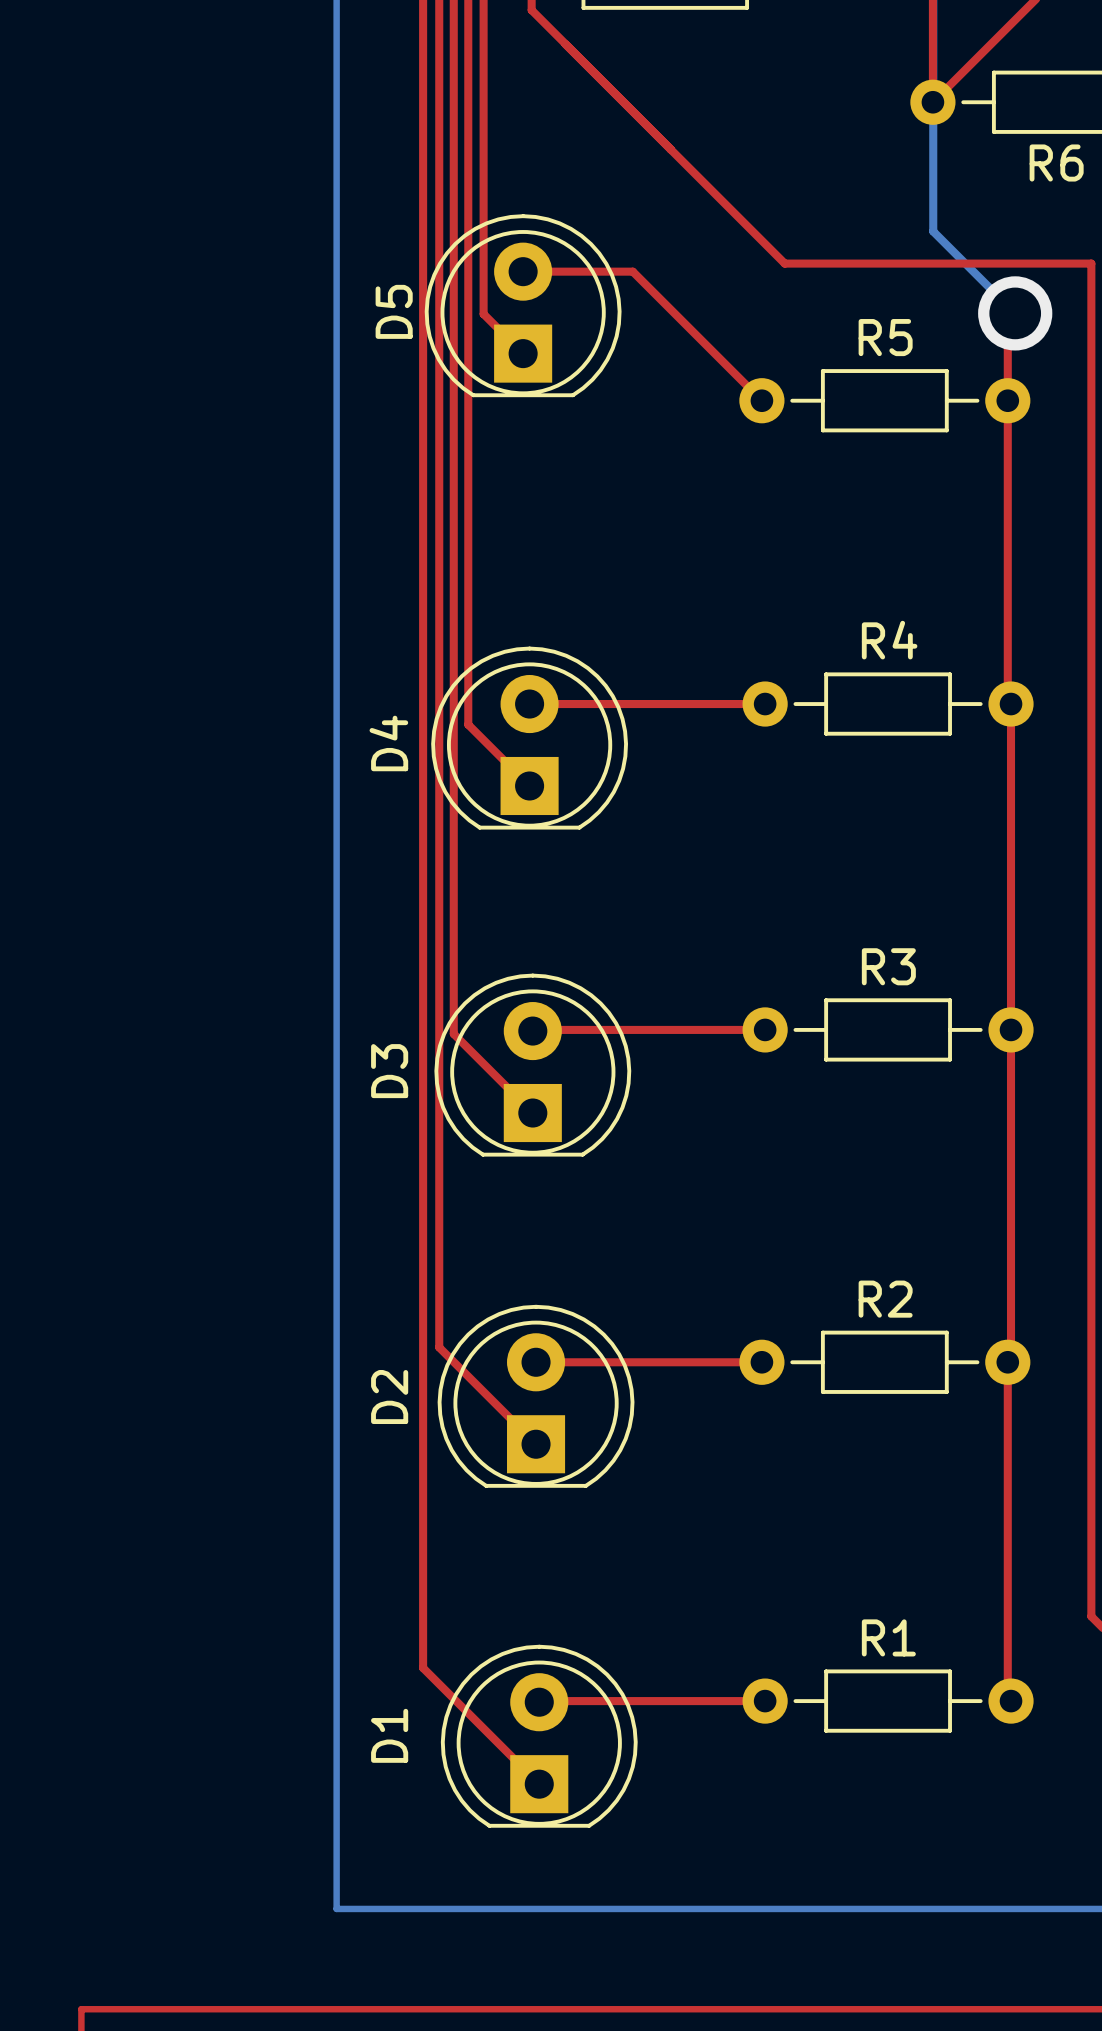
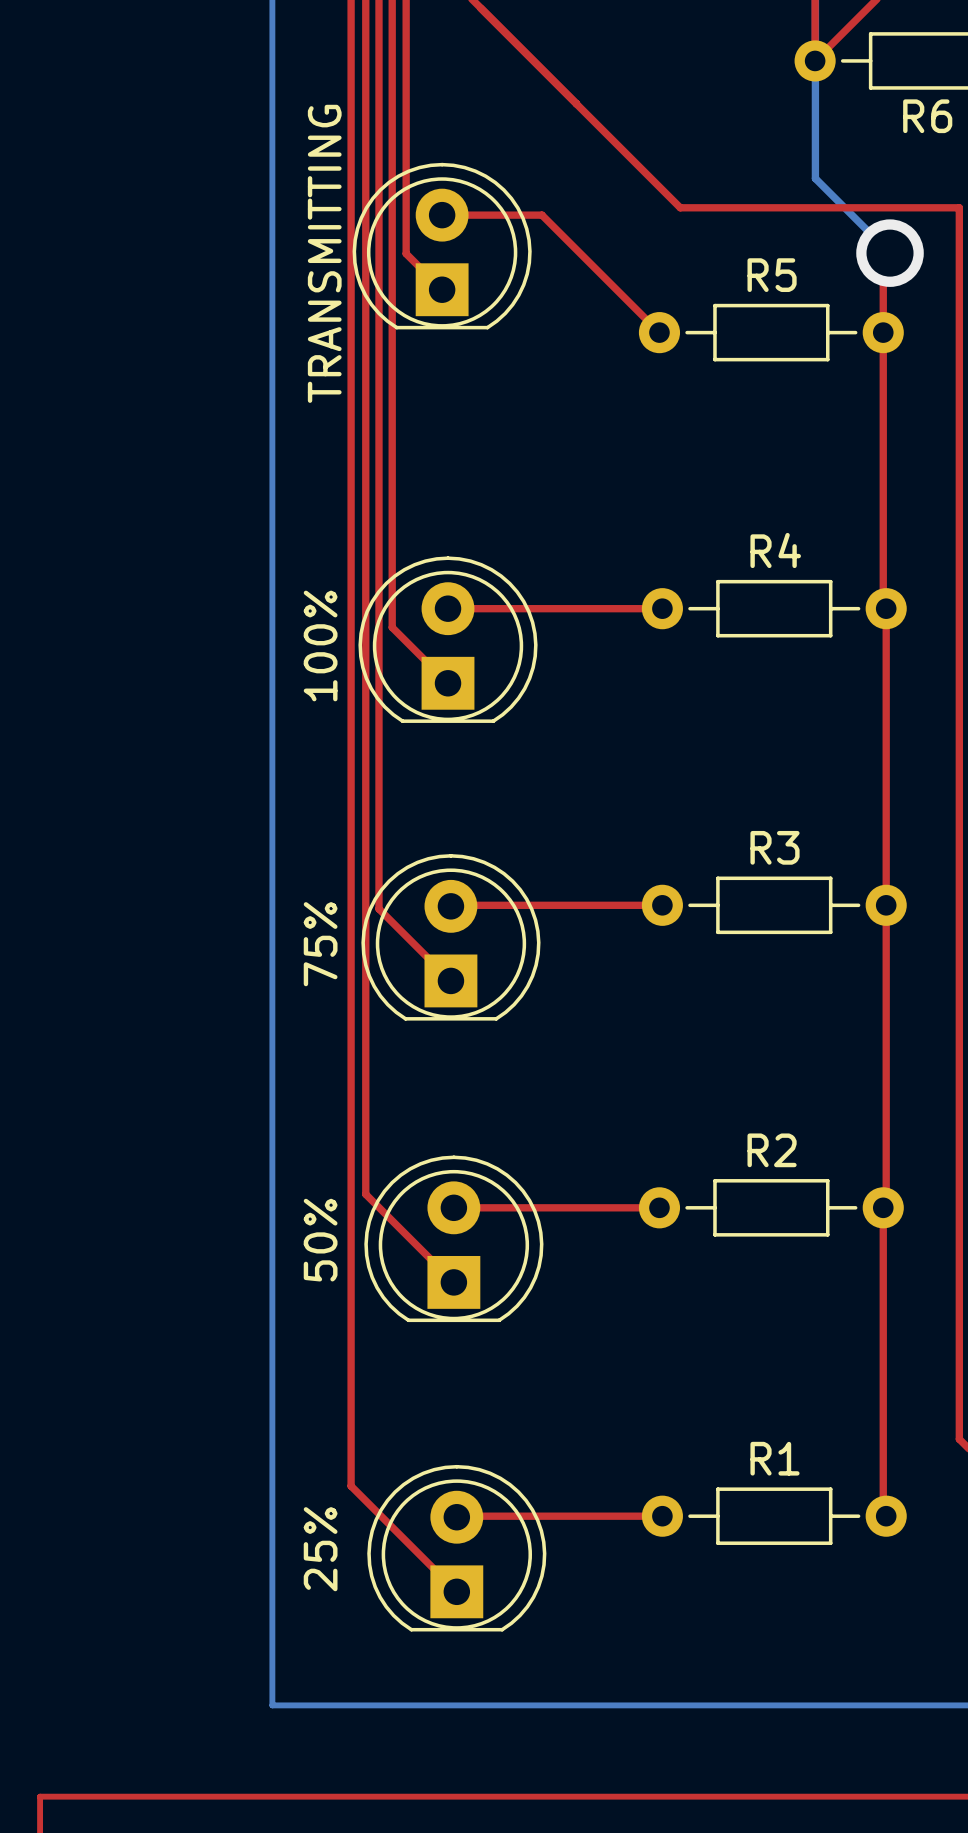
D5 name: D5 (394, 311) -> TRANSMITTING (324, 253)
D4 name: D4 (388, 743) -> 100% (320, 645)
D3 name: D3 (389, 1071) -> 75% (320, 944)
D2 name: D2 (389, 1397) -> 50% (320, 1240)
D1 name: D1 (389, 1735) -> 25% (320, 1549)

